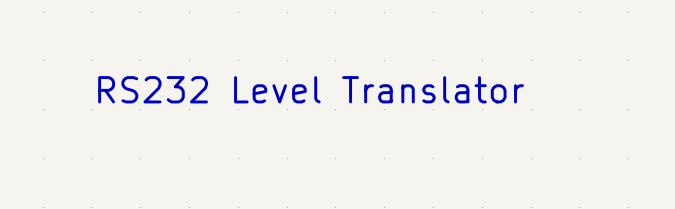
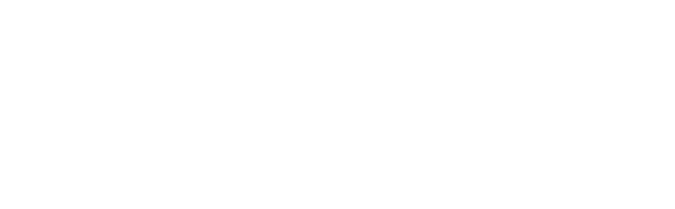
text: RS232 Level Translator (311, 89) -> none

